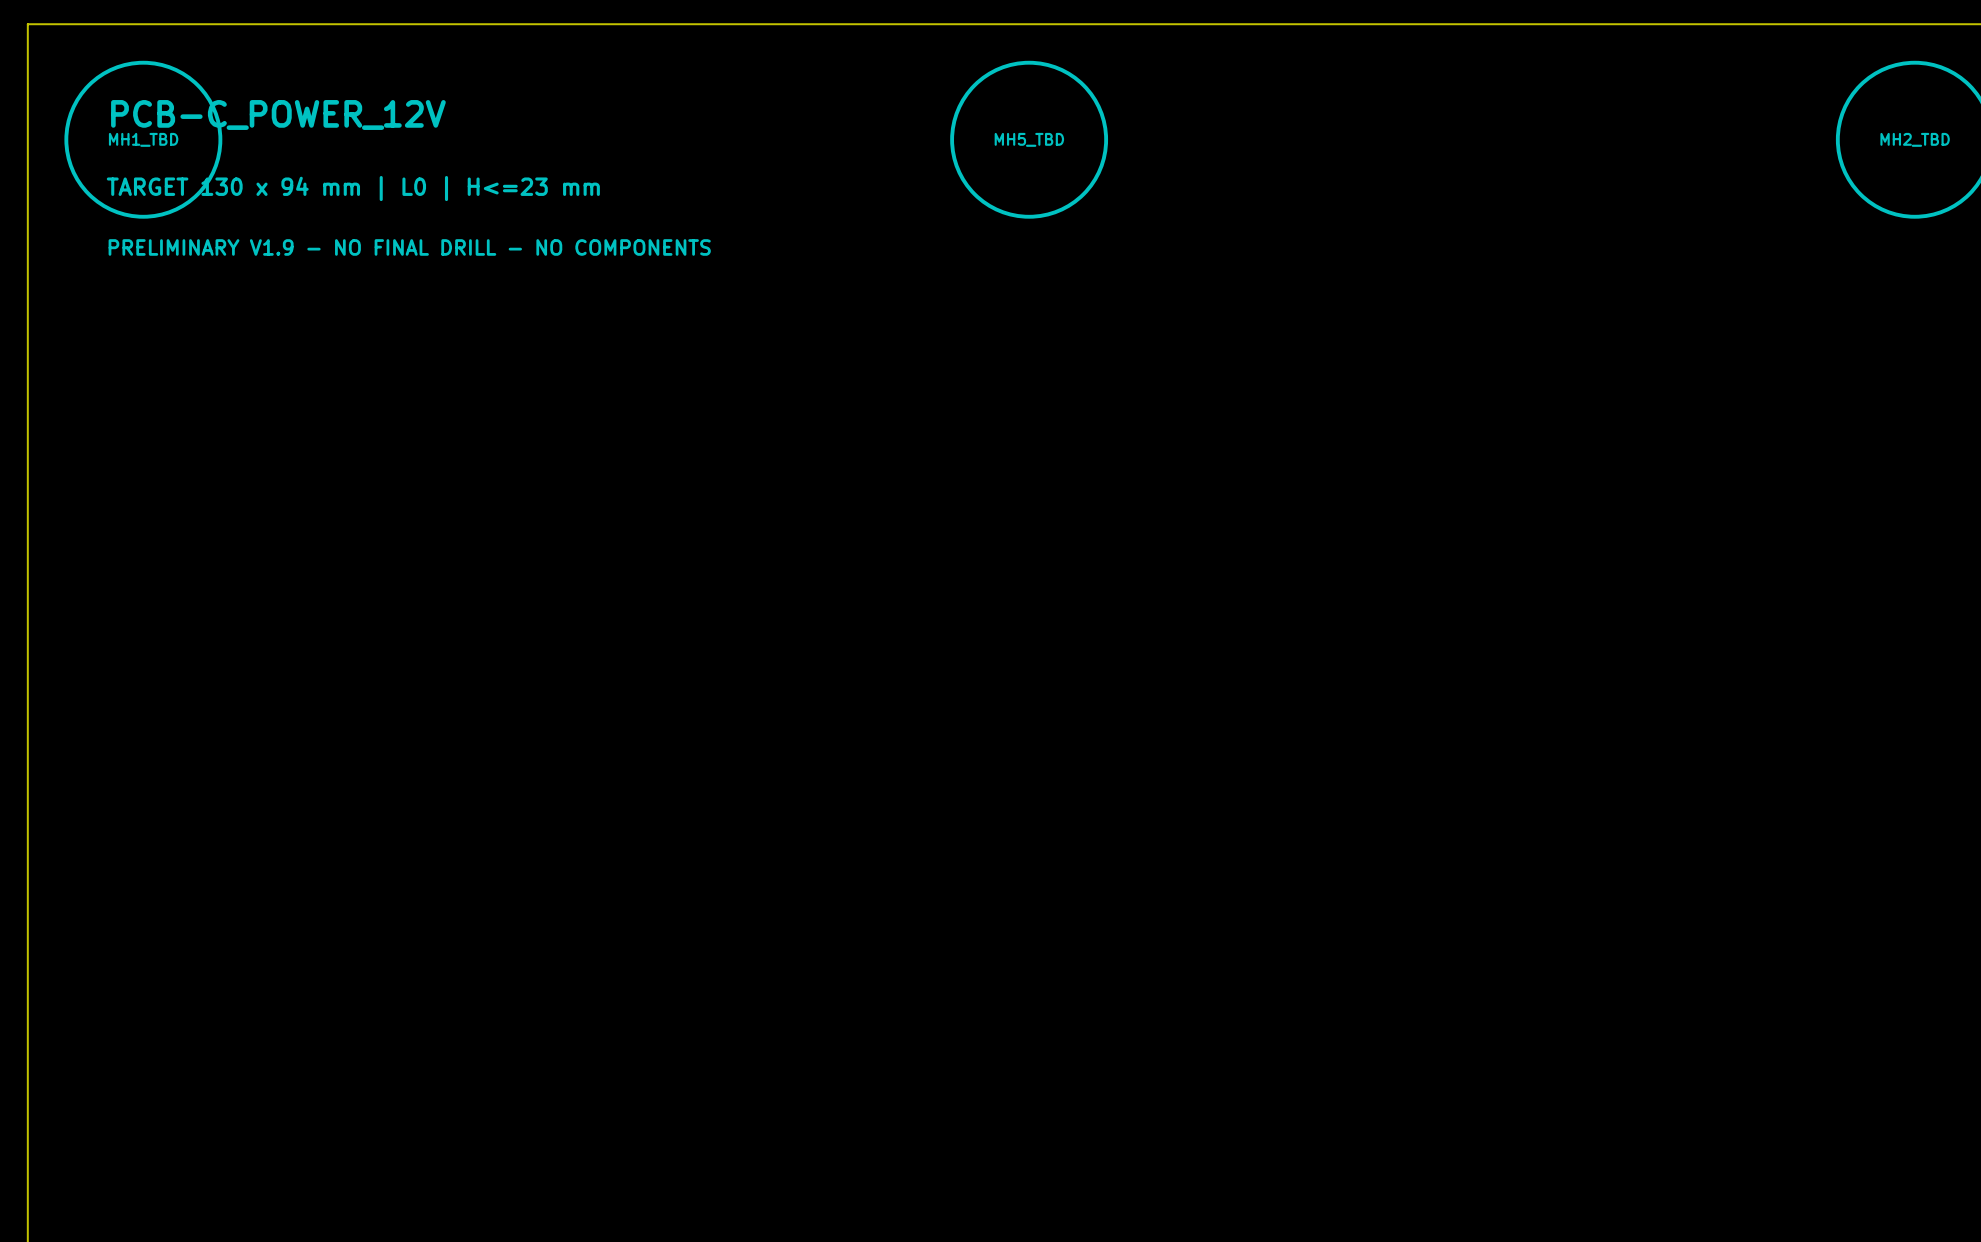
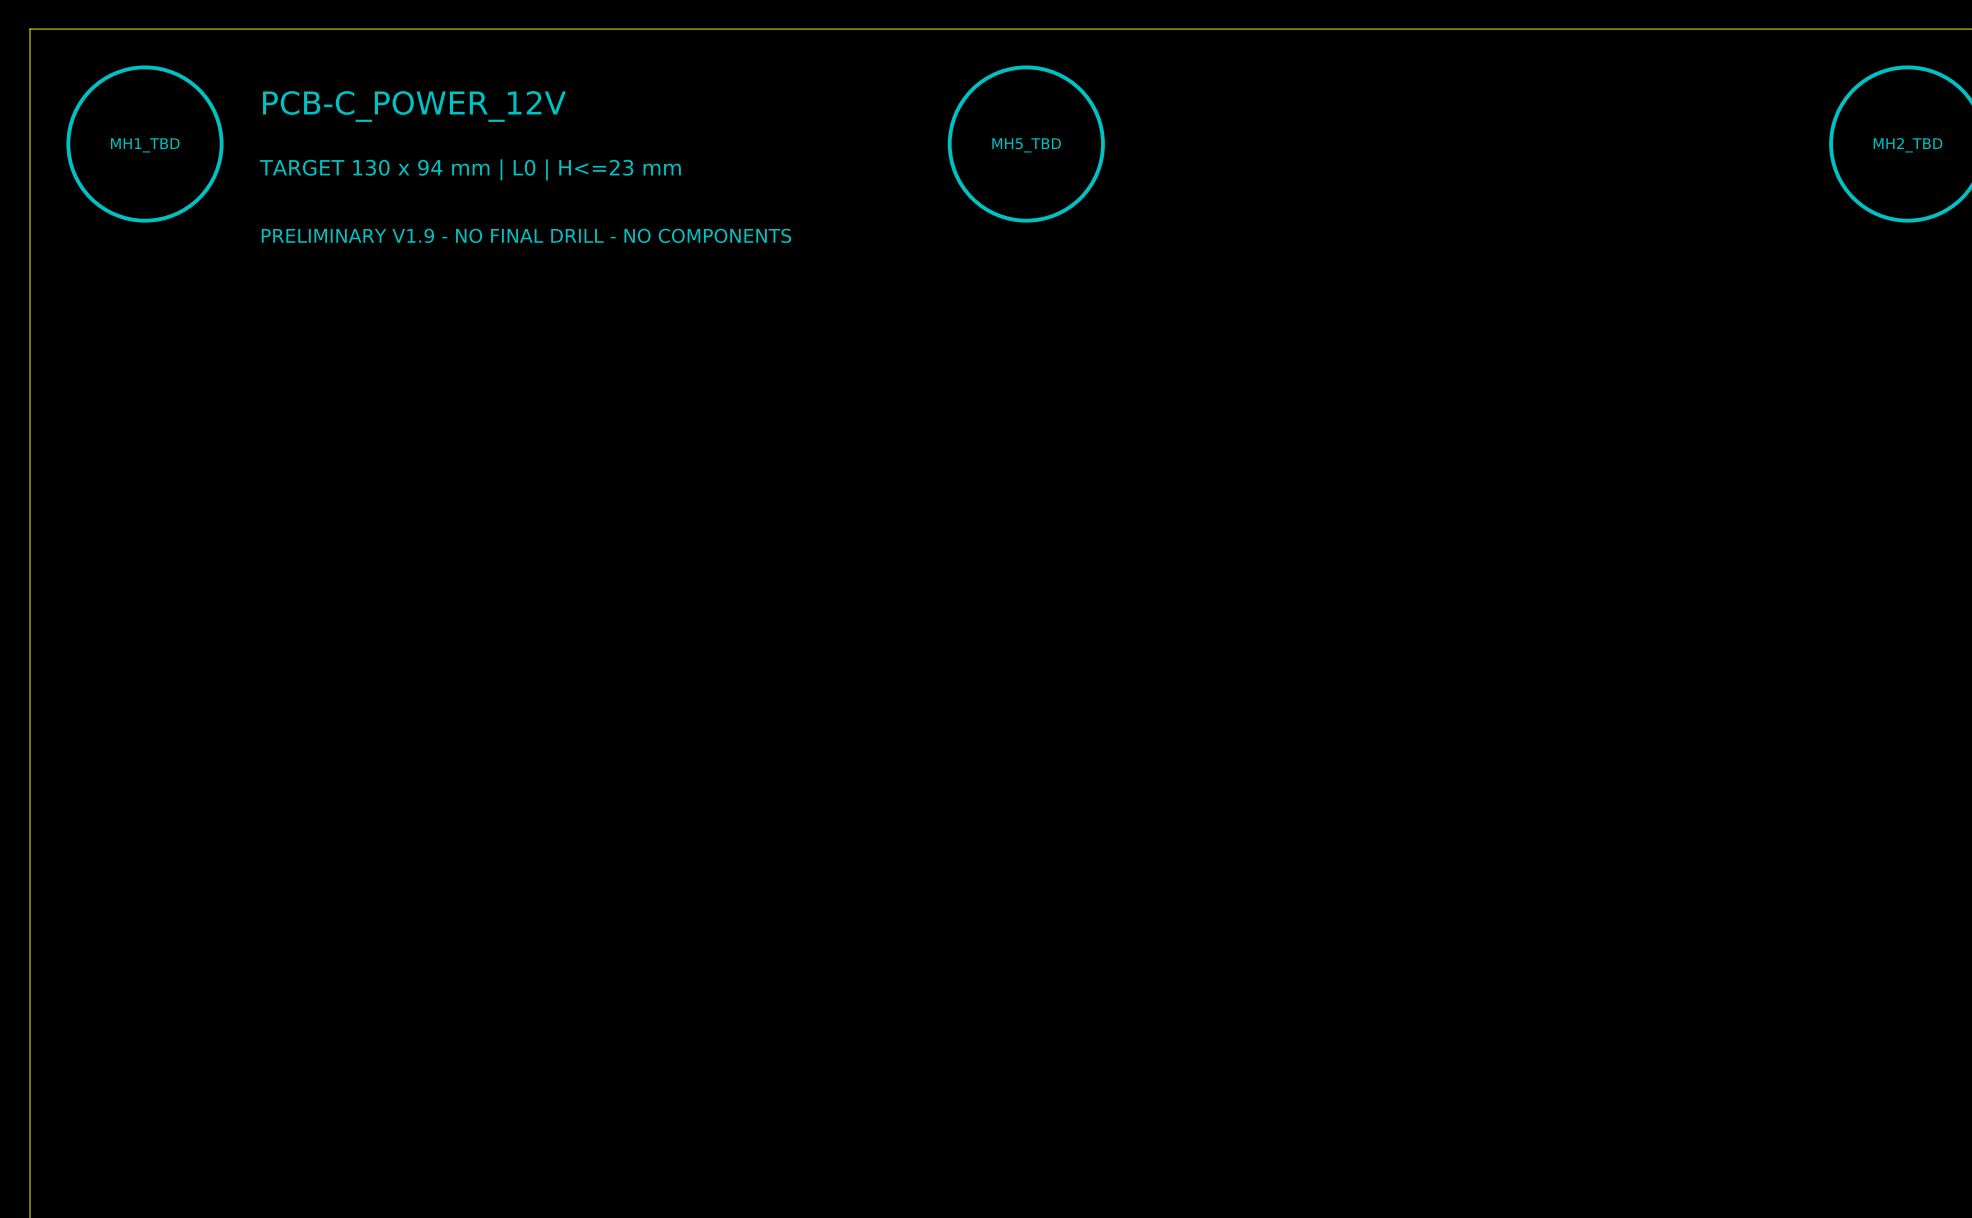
text position: PCB-C_POWER_12V (278, 114) -> PCB-C_POWER_12V (414, 106)
text position: TARGET 130 x 94 mm | L0 | H<=23 mm (353, 188) -> TARGET 130 x 94 mm | L0 | H<=23 mm (470, 169)
text position: PRELIMINARY V1.9 - NO FINAL DRILL - NO COMPONENTS (409, 247) -> PRELIMINARY V1.9 - NO FINAL DRILL - NO COMPONENTS (526, 235)

